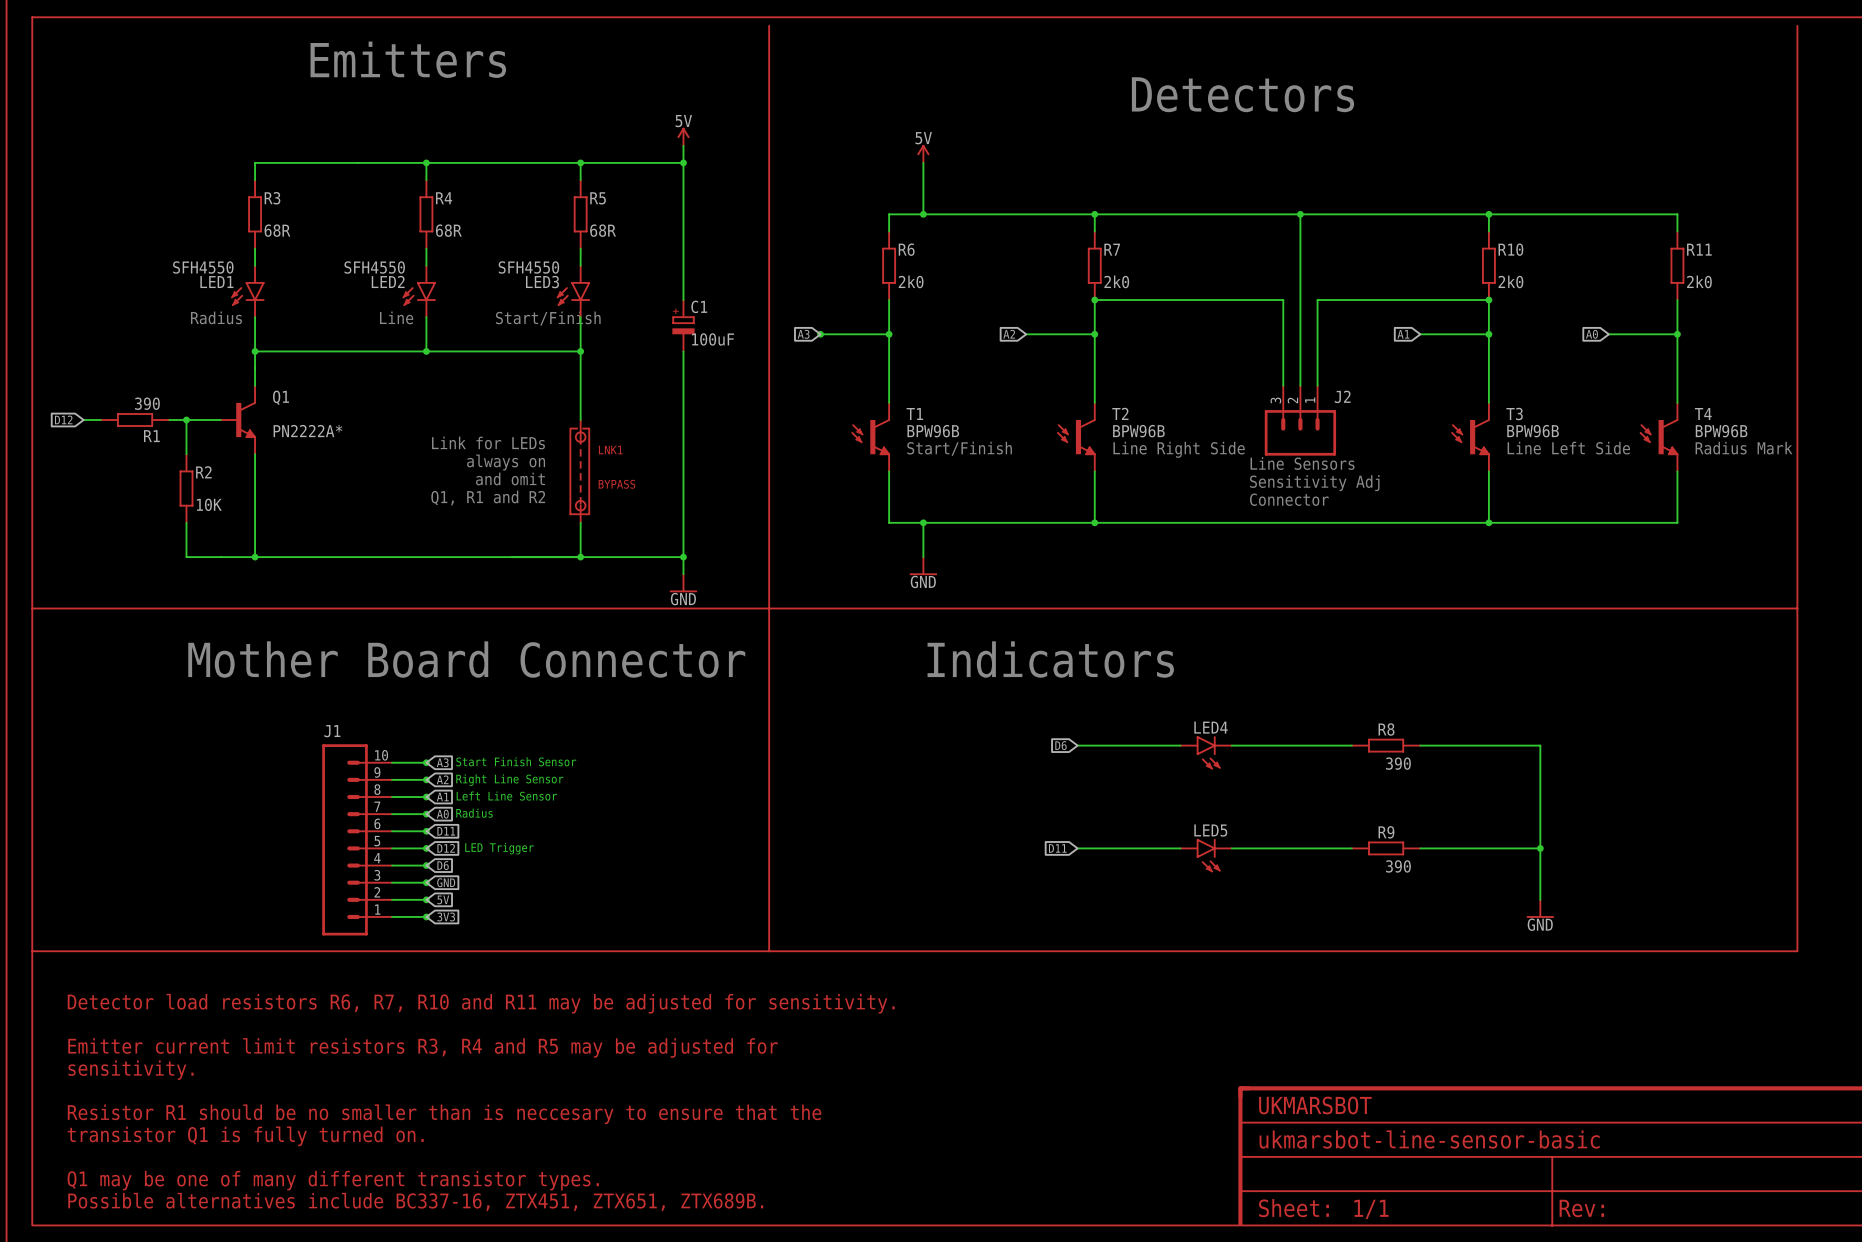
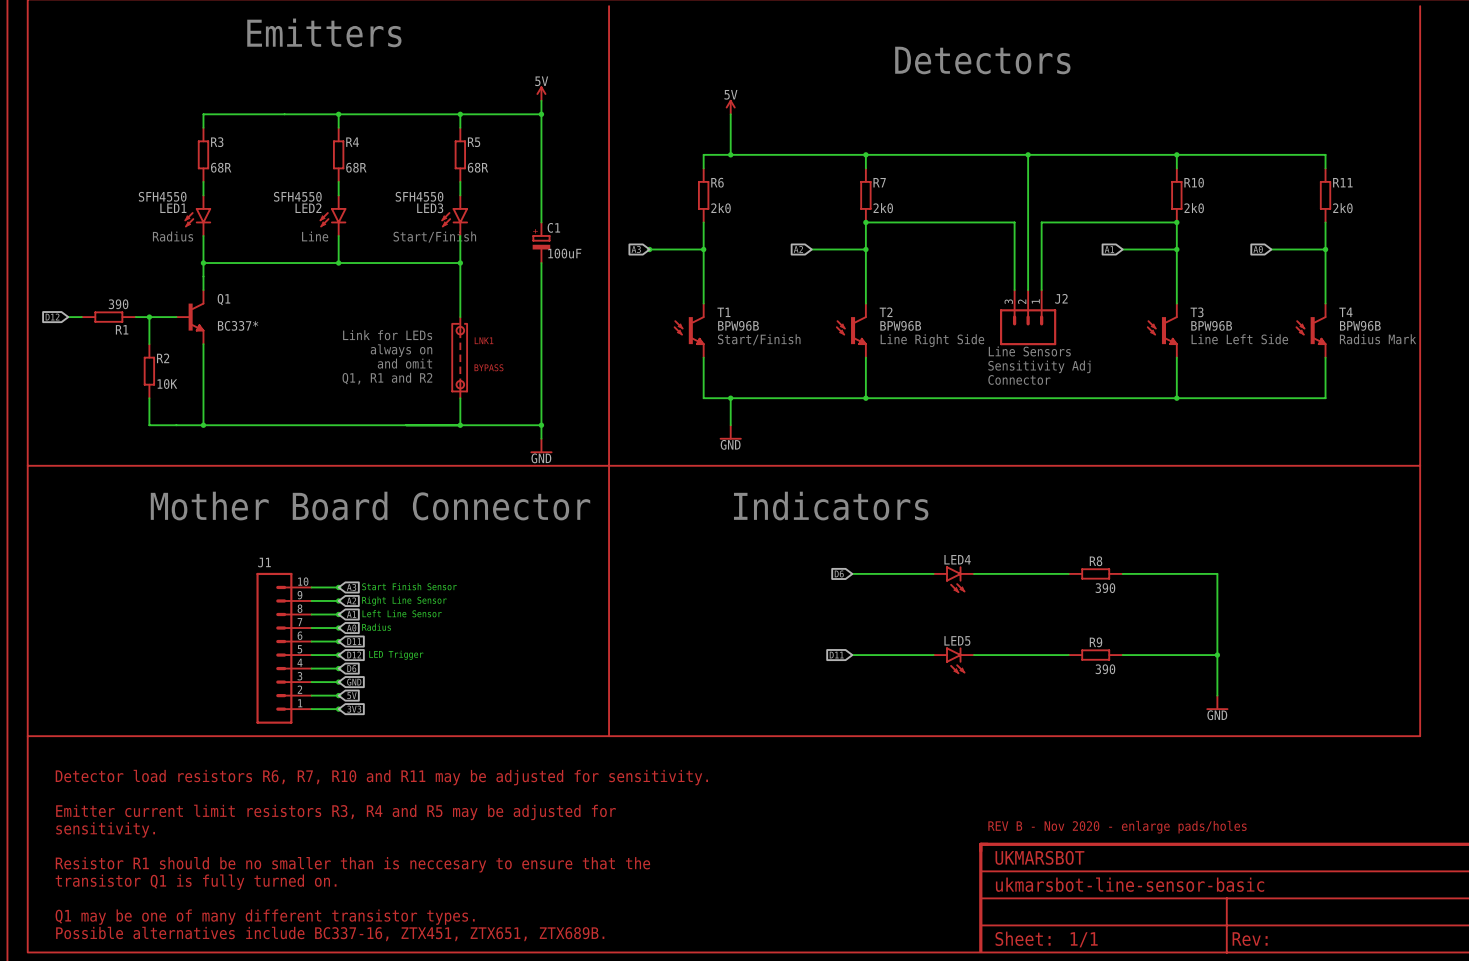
Q1 value: PN2222A* (307, 431) -> BC337* (238, 325)
text: none -> REV B - Nov 2020 - enlarge pads/holes (1117, 827)

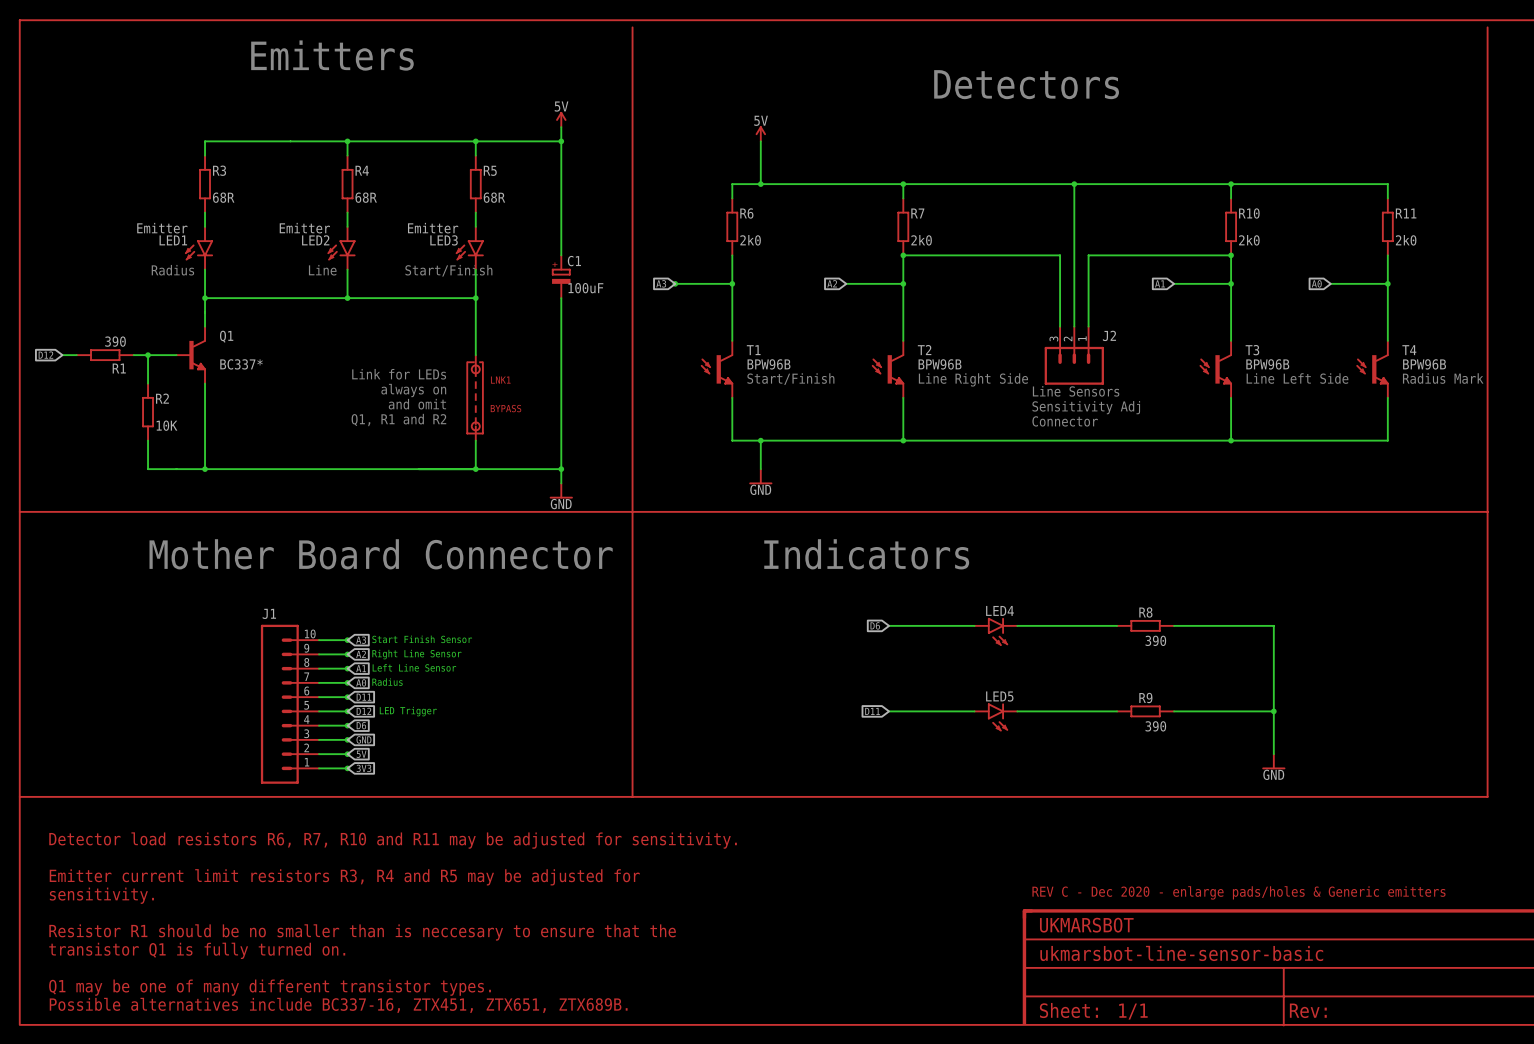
LED1 value: SFH4550 (162, 196) -> Emitter (162, 228)
LED2 value: SFH4550 (297, 196) -> Emitter (304, 228)
LED3 value: SFH4550 (419, 196) -> Emitter (433, 228)
text: REV B - Nov 2020 - enlarge pads/holes (1117, 827) -> REV C - Dec 2020 - enlarge pads/holes & Generic emitters (1238, 892)

